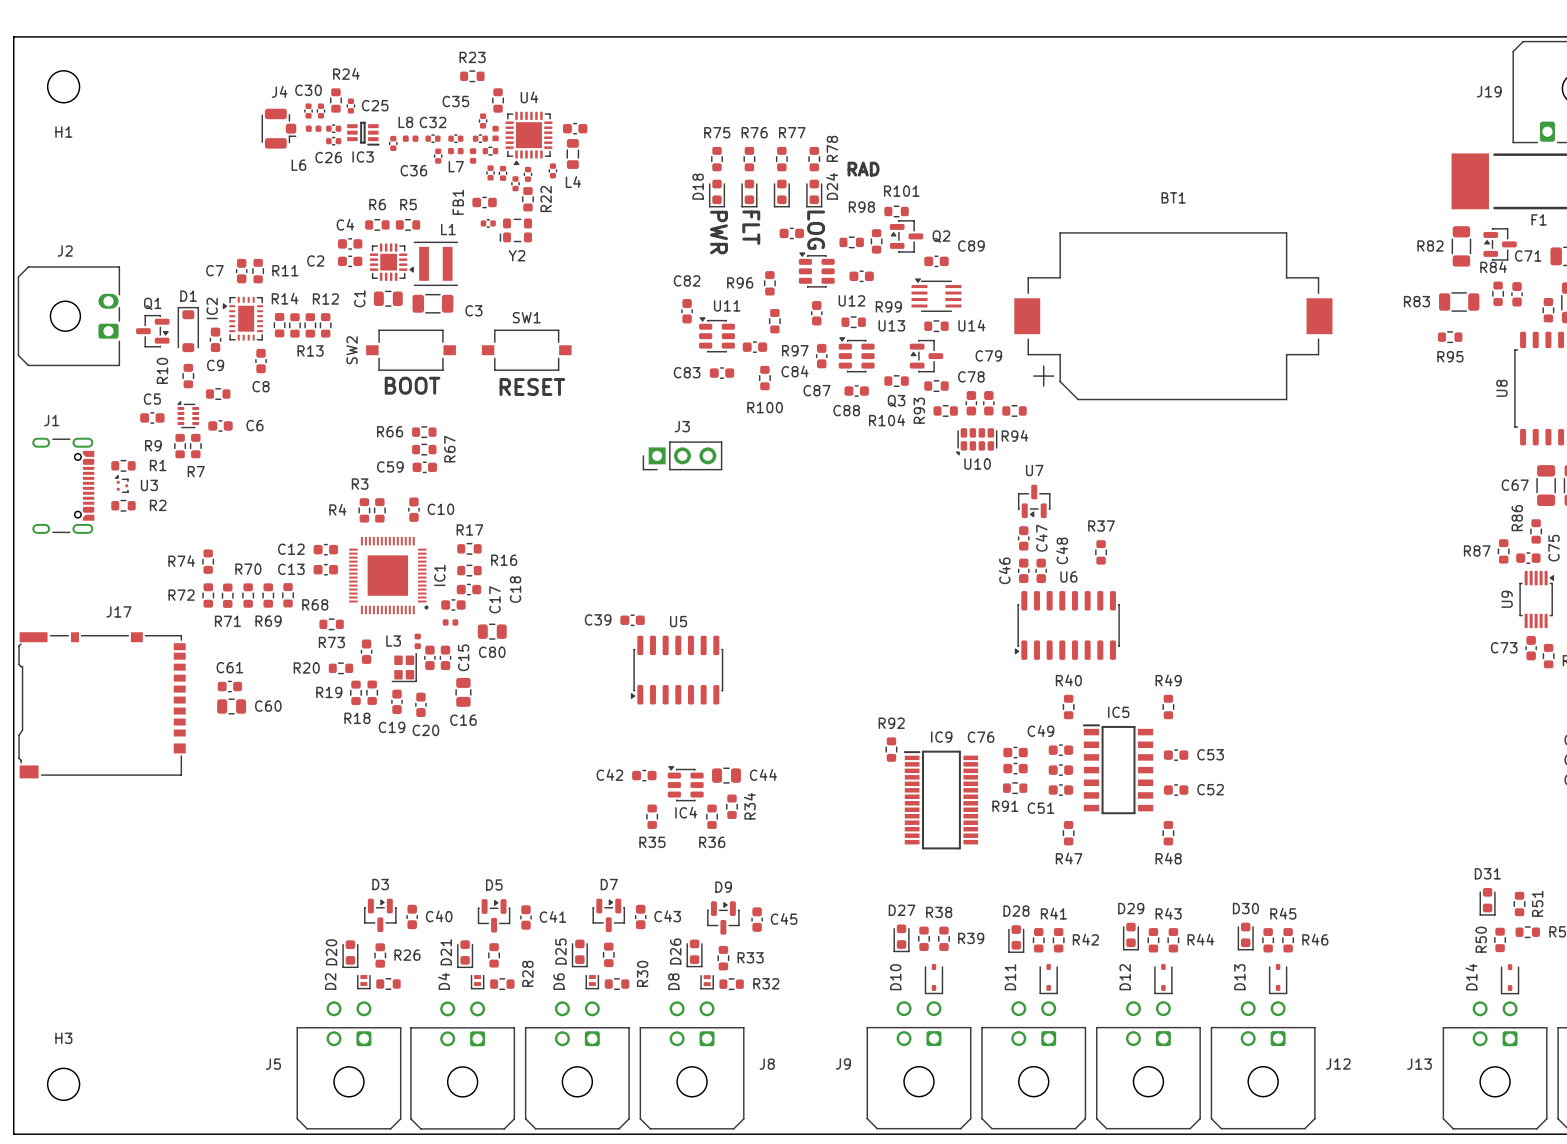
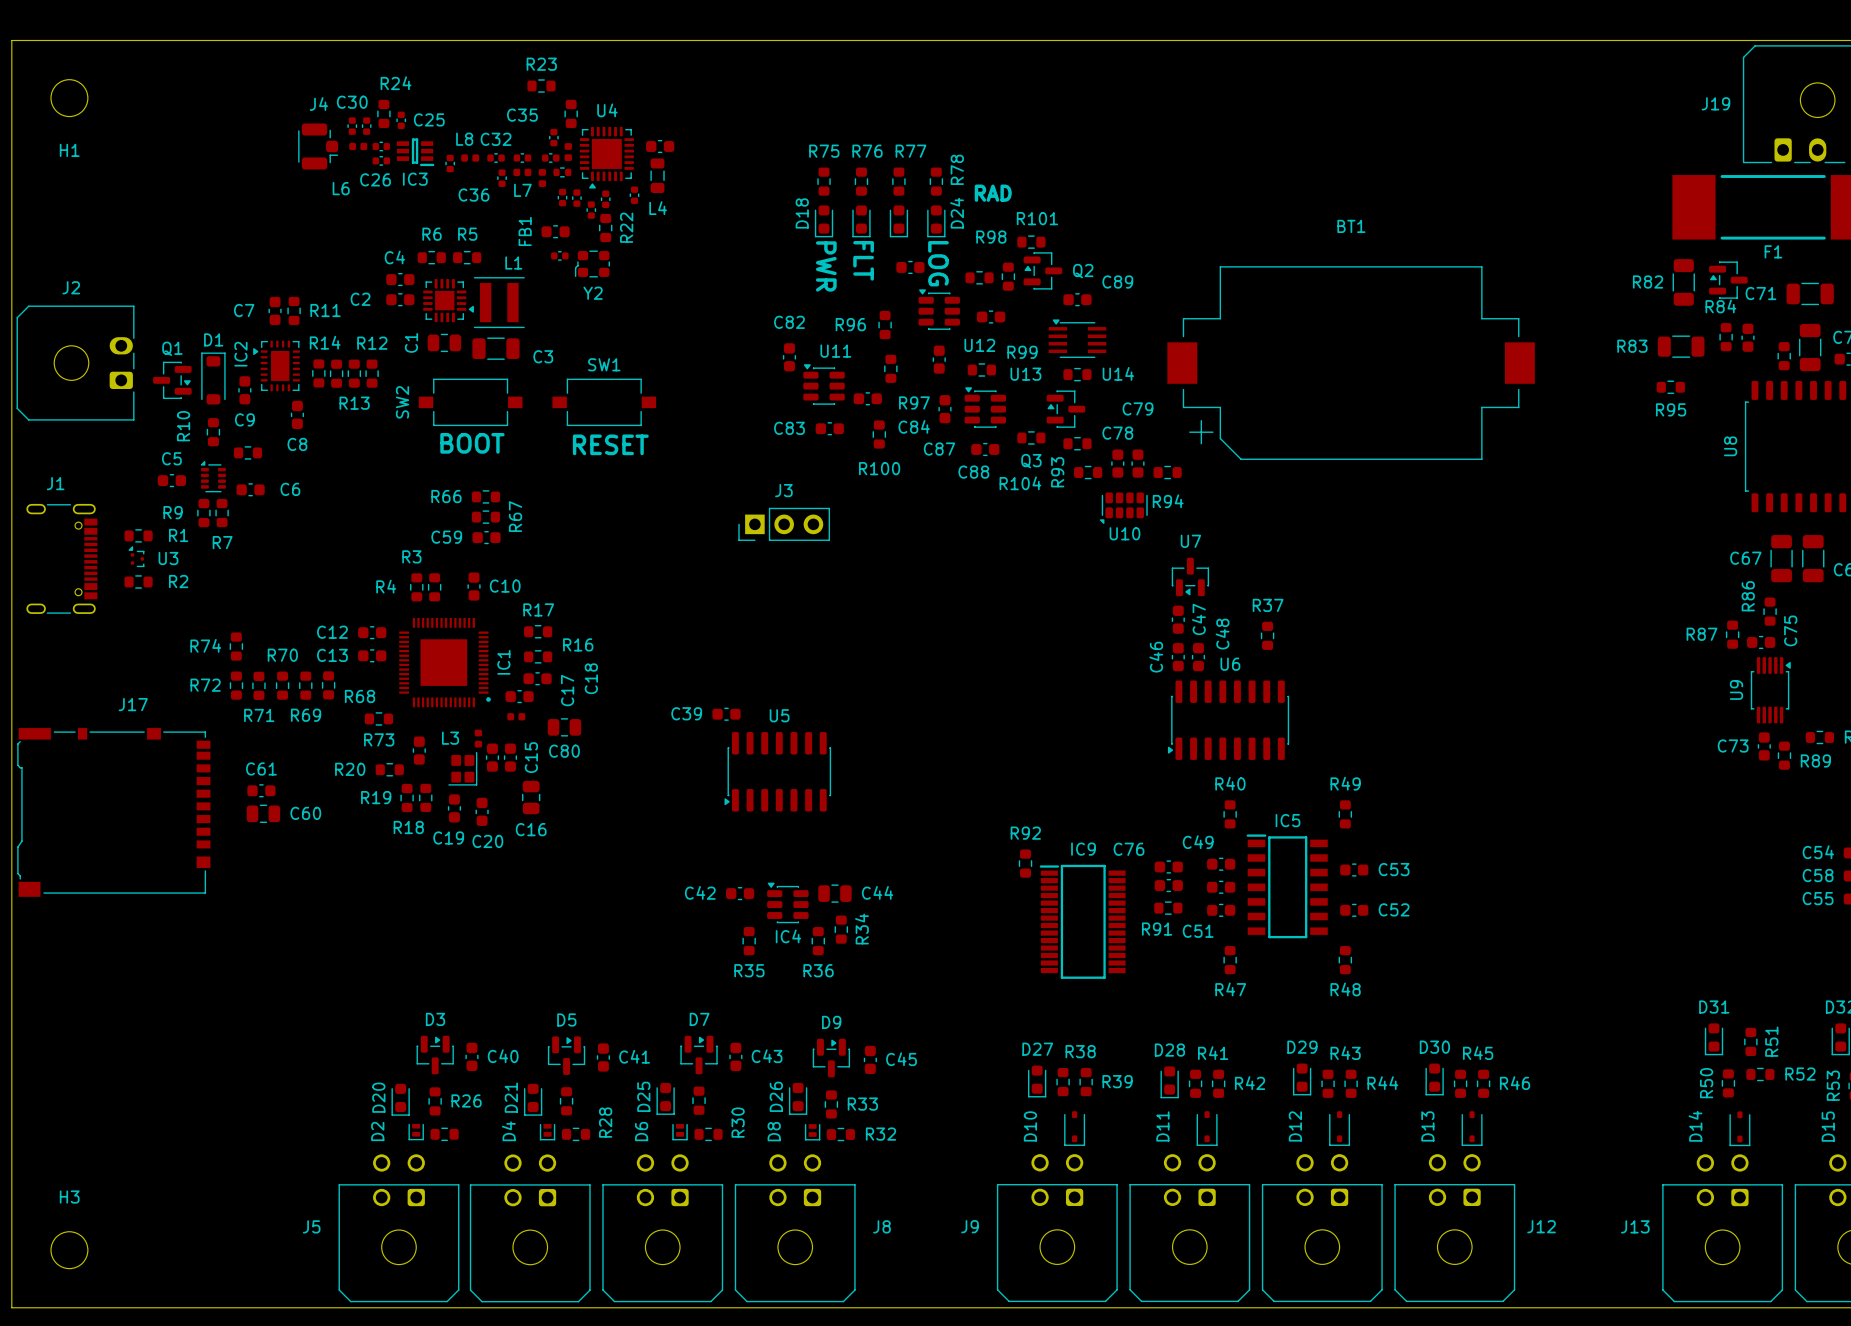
Y2 footprint: [499, 218, 532, 243] -> [574, 250, 610, 278]
J1 footprint: [32, 437, 95, 534] -> [26, 503, 98, 614]

